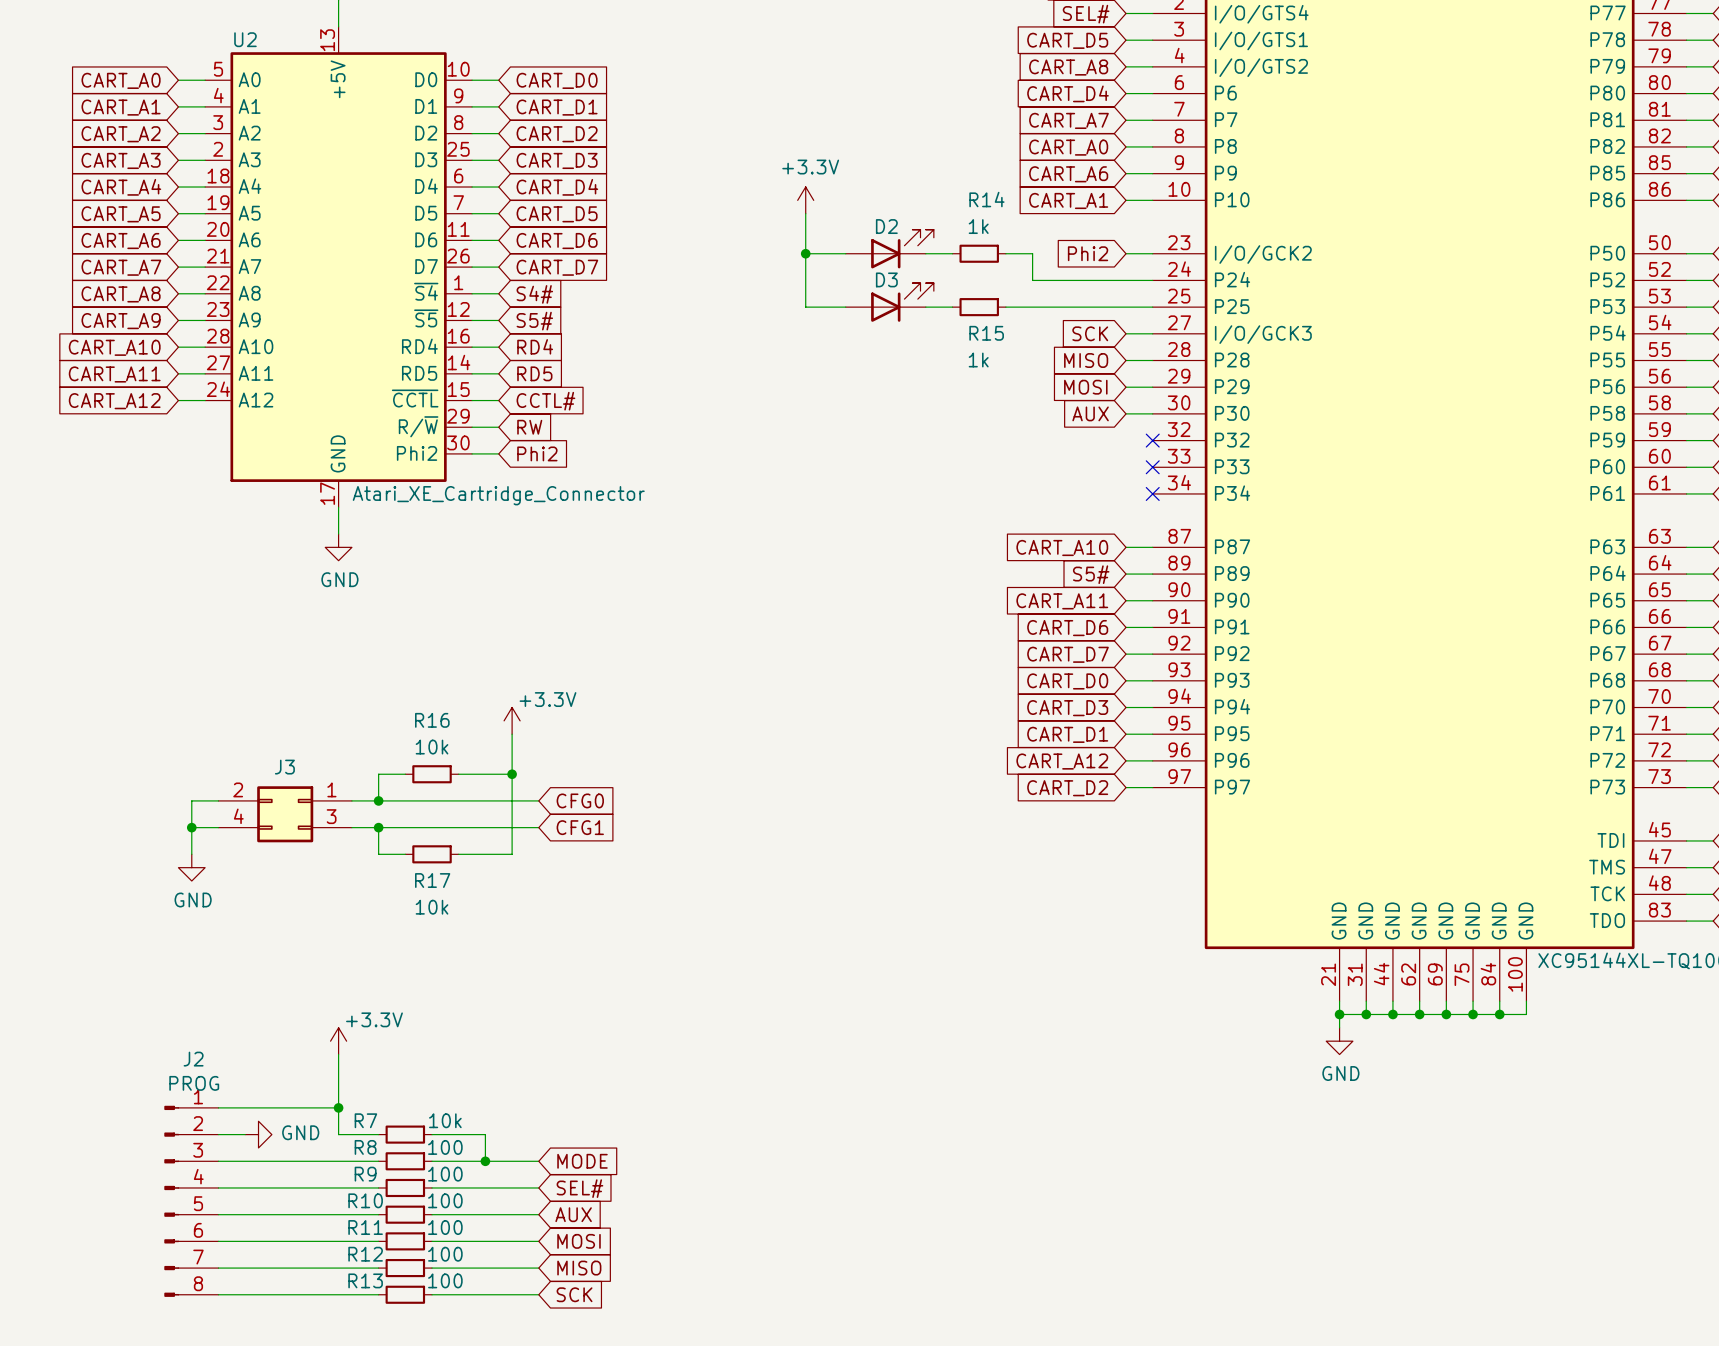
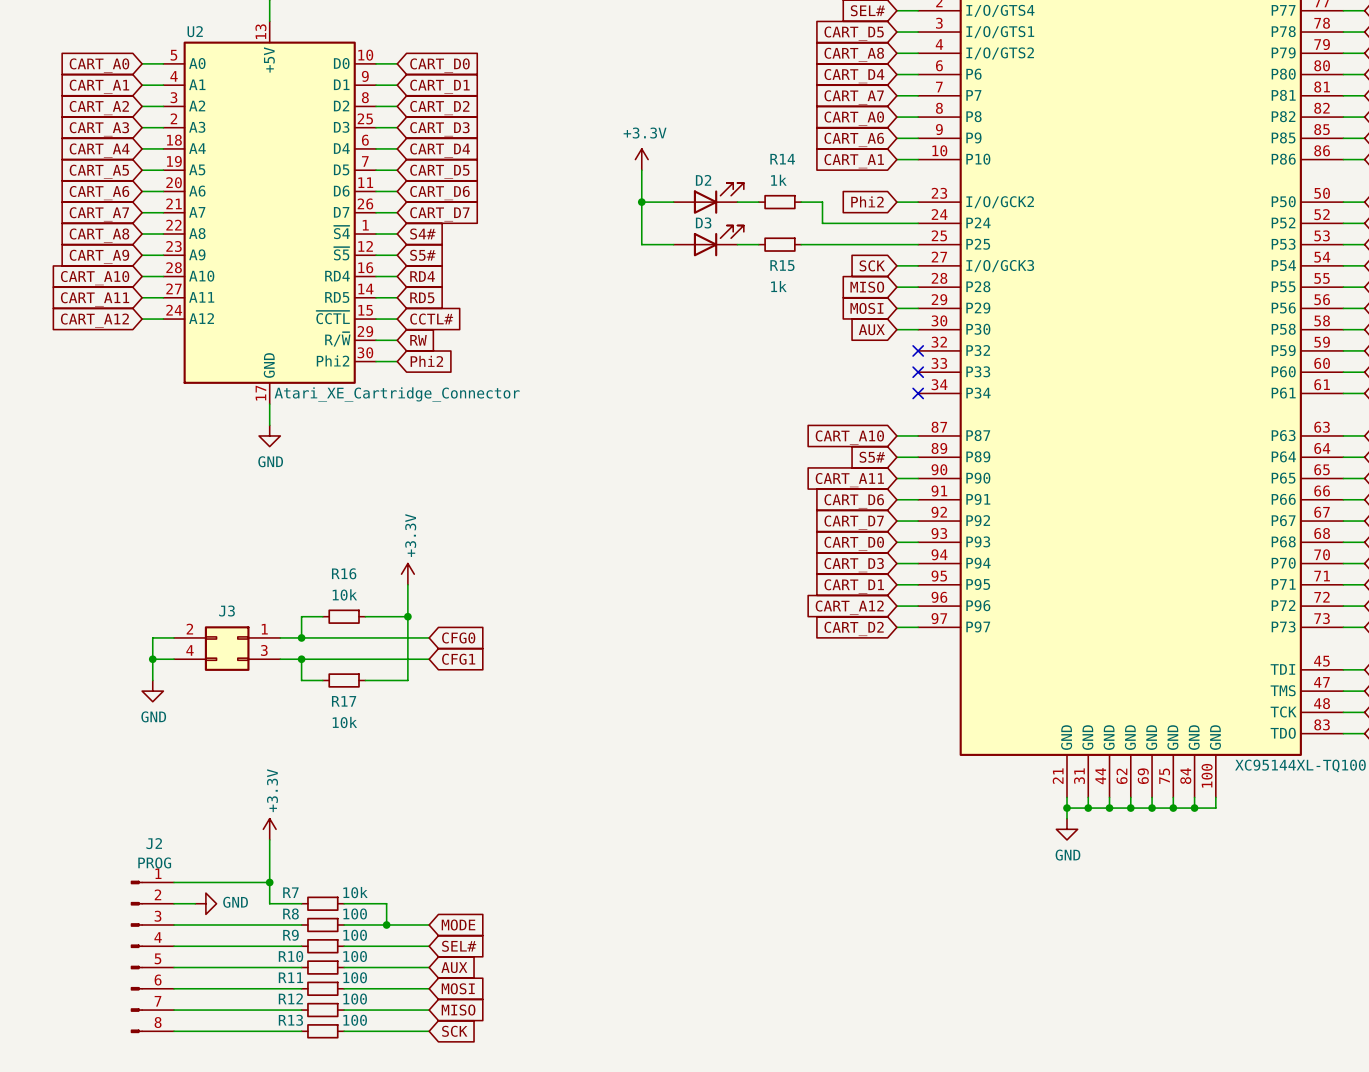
power symbol text rotation: 0° (547, 699) -> 90° counterclockwise (410, 535)
power symbol text rotation: 0° (374, 1019) -> 90° counterclockwise (272, 790)

